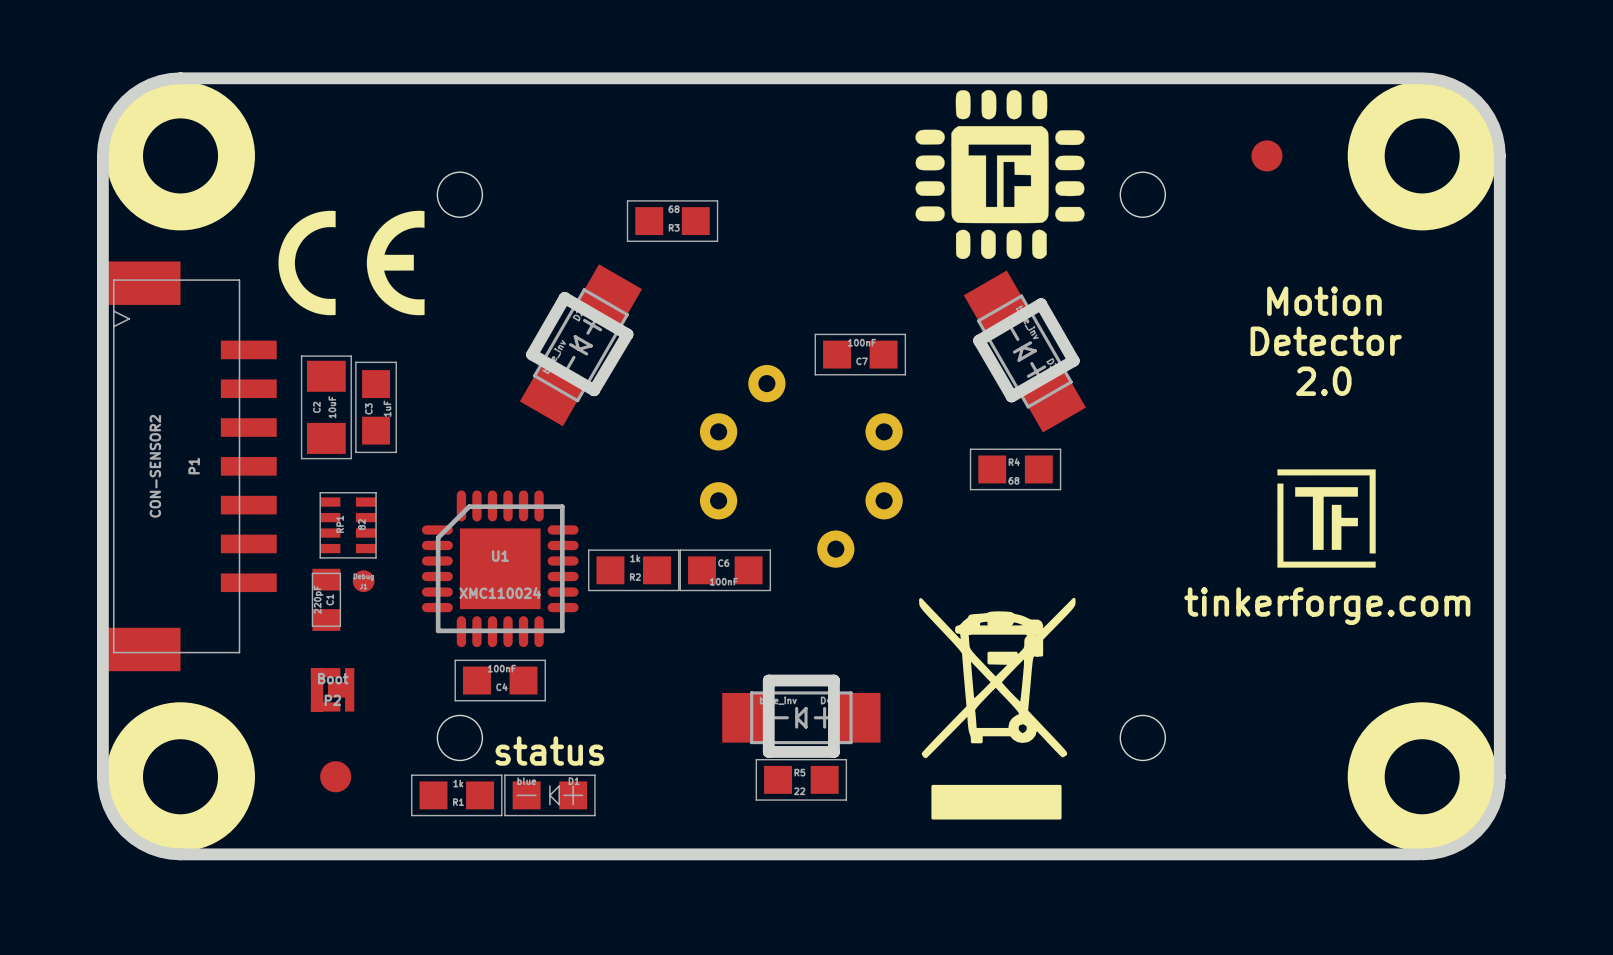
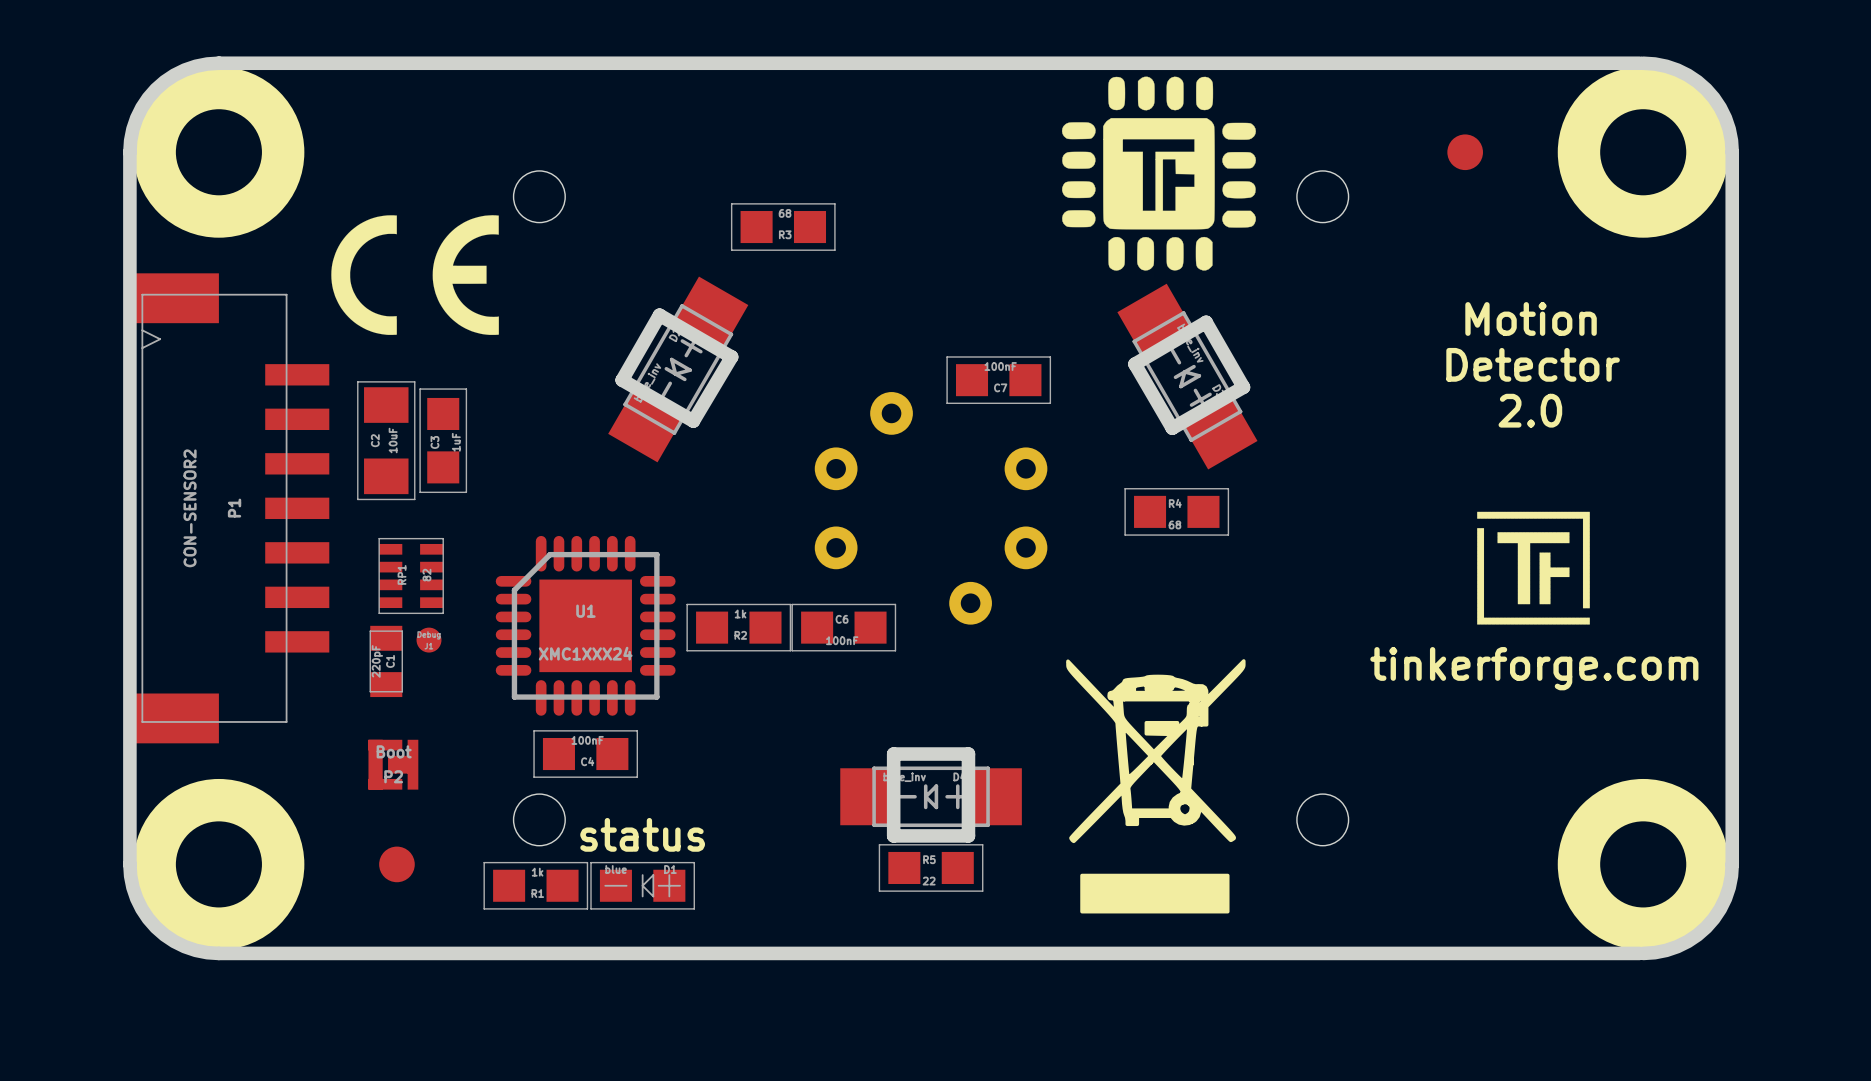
U1 value: XMC110024 (500, 593) -> XMC1XXX24 (585, 653)

